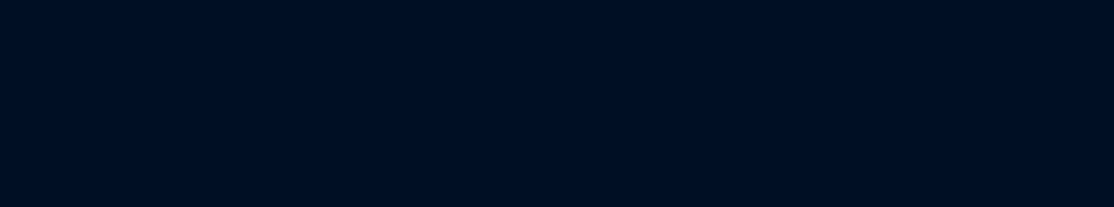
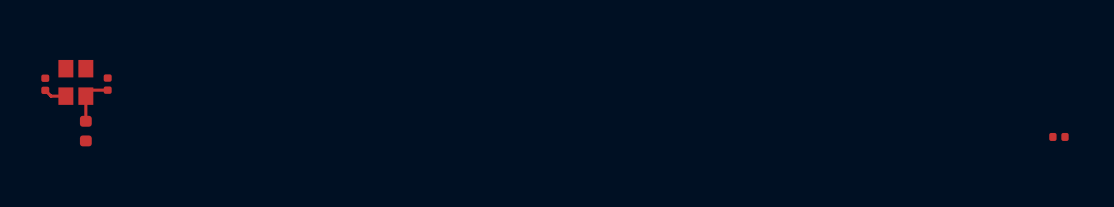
part: none -> (75, 82)
part: none -> (45, 84)
part: none -> (107, 84)
top track: none -> (45, 90) (51, 96) (65, 96)
top track: none -> (107, 90) (91, 90) (85, 96) (85, 121)
part: none -> (85, 131)
part: none -> (1058, 136)

